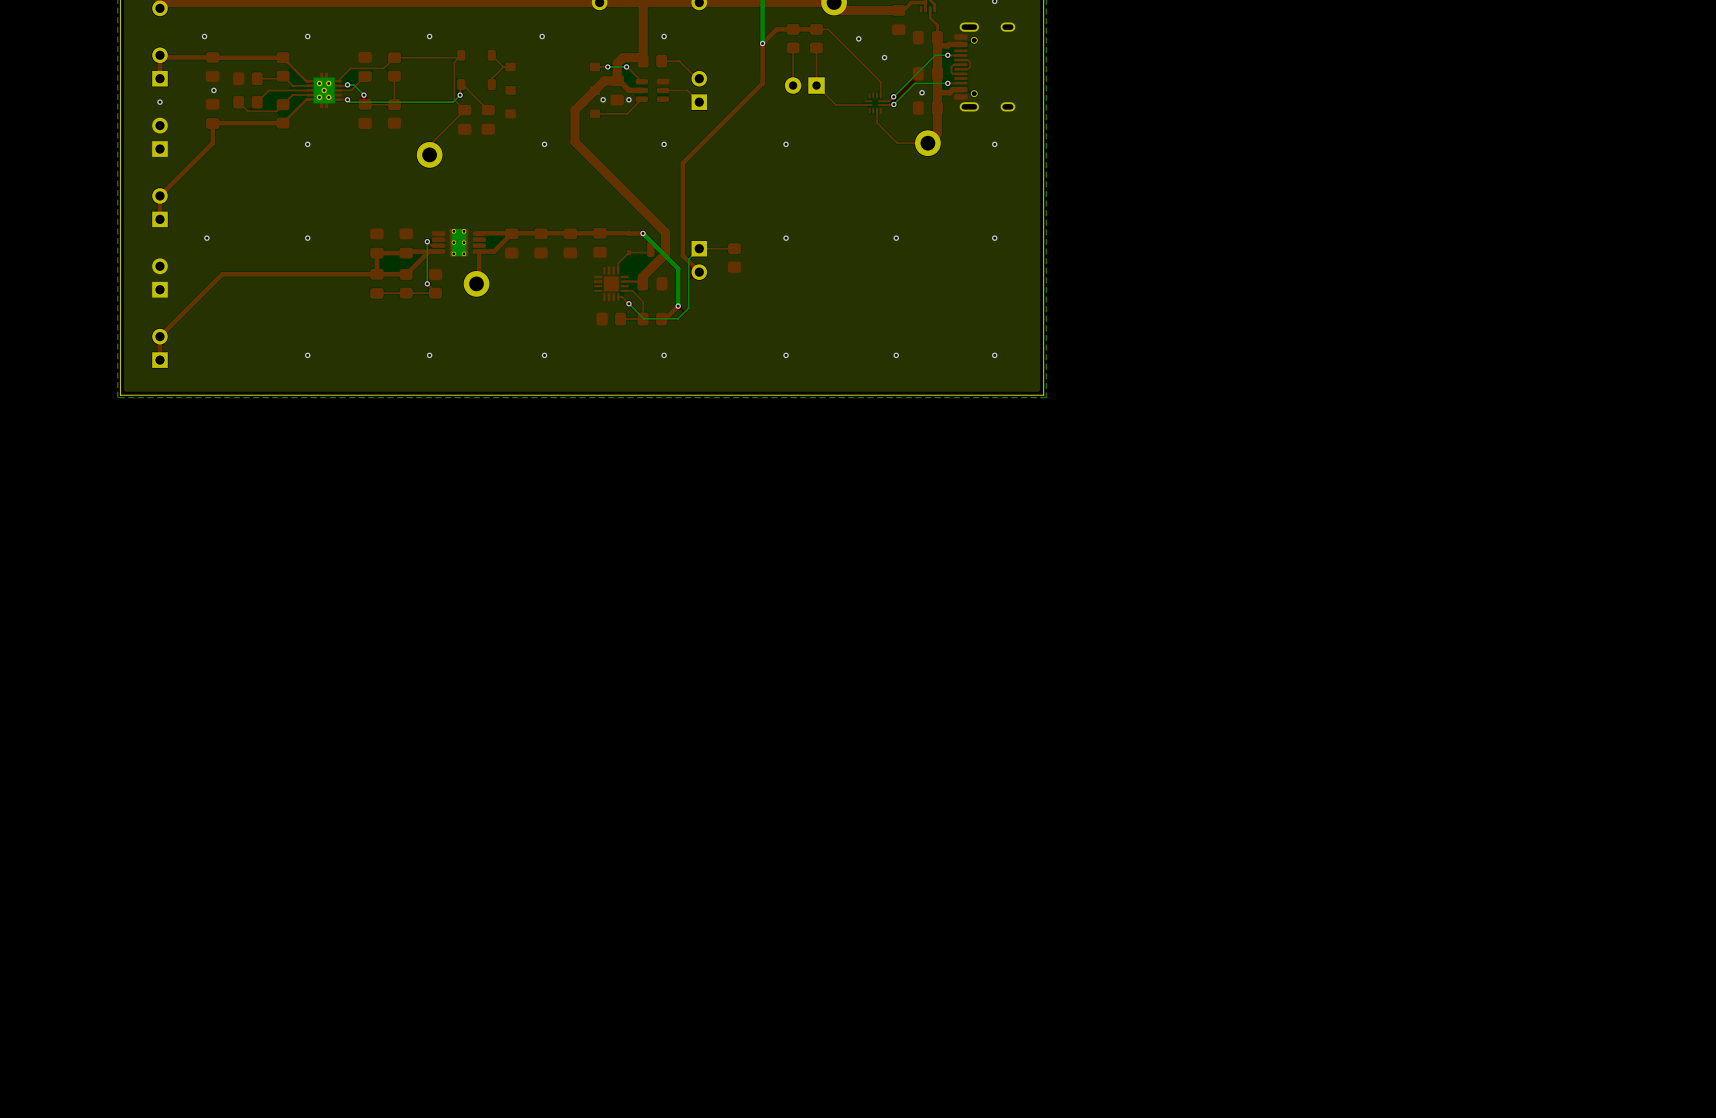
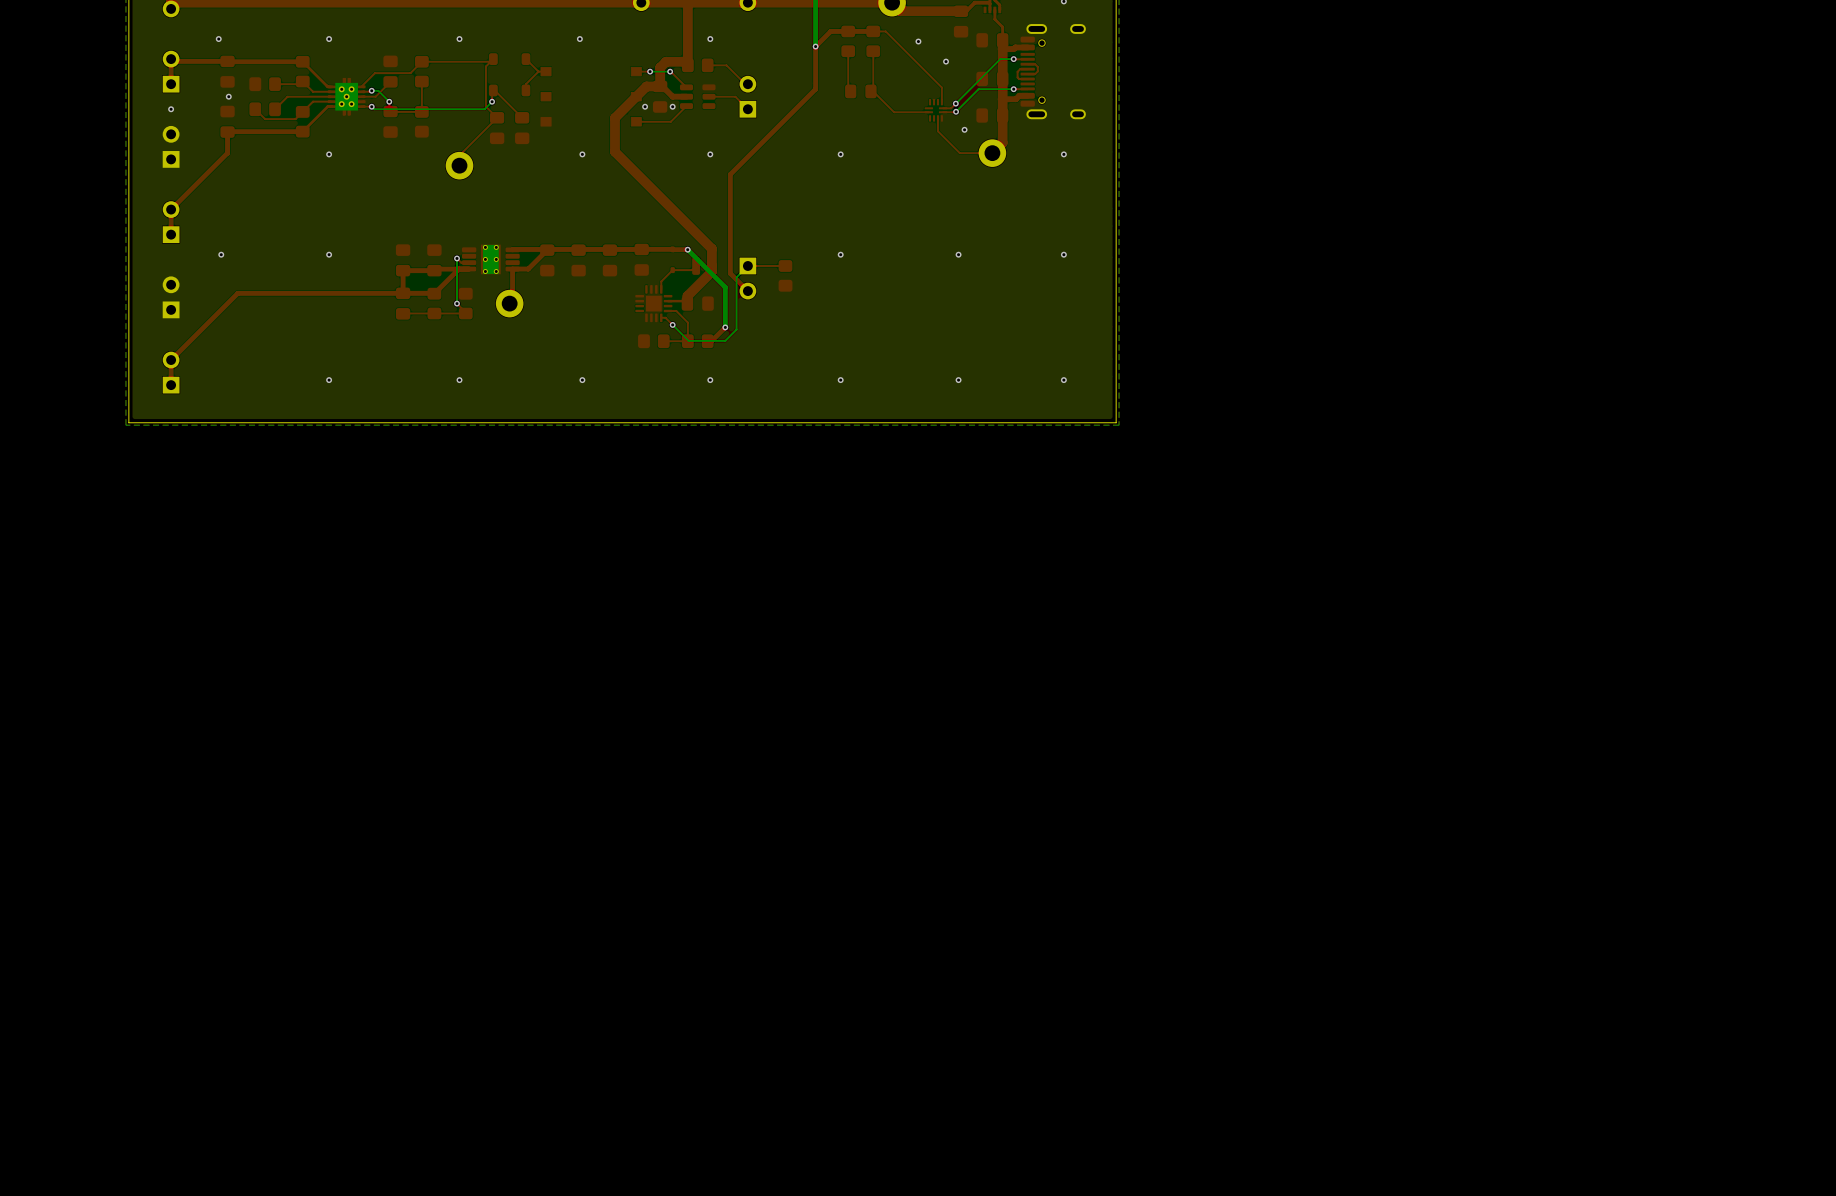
part footprint: [784, 77, 825, 94] -> [845, 84, 877, 99]
via position: (922, 92) -> (964, 129)

